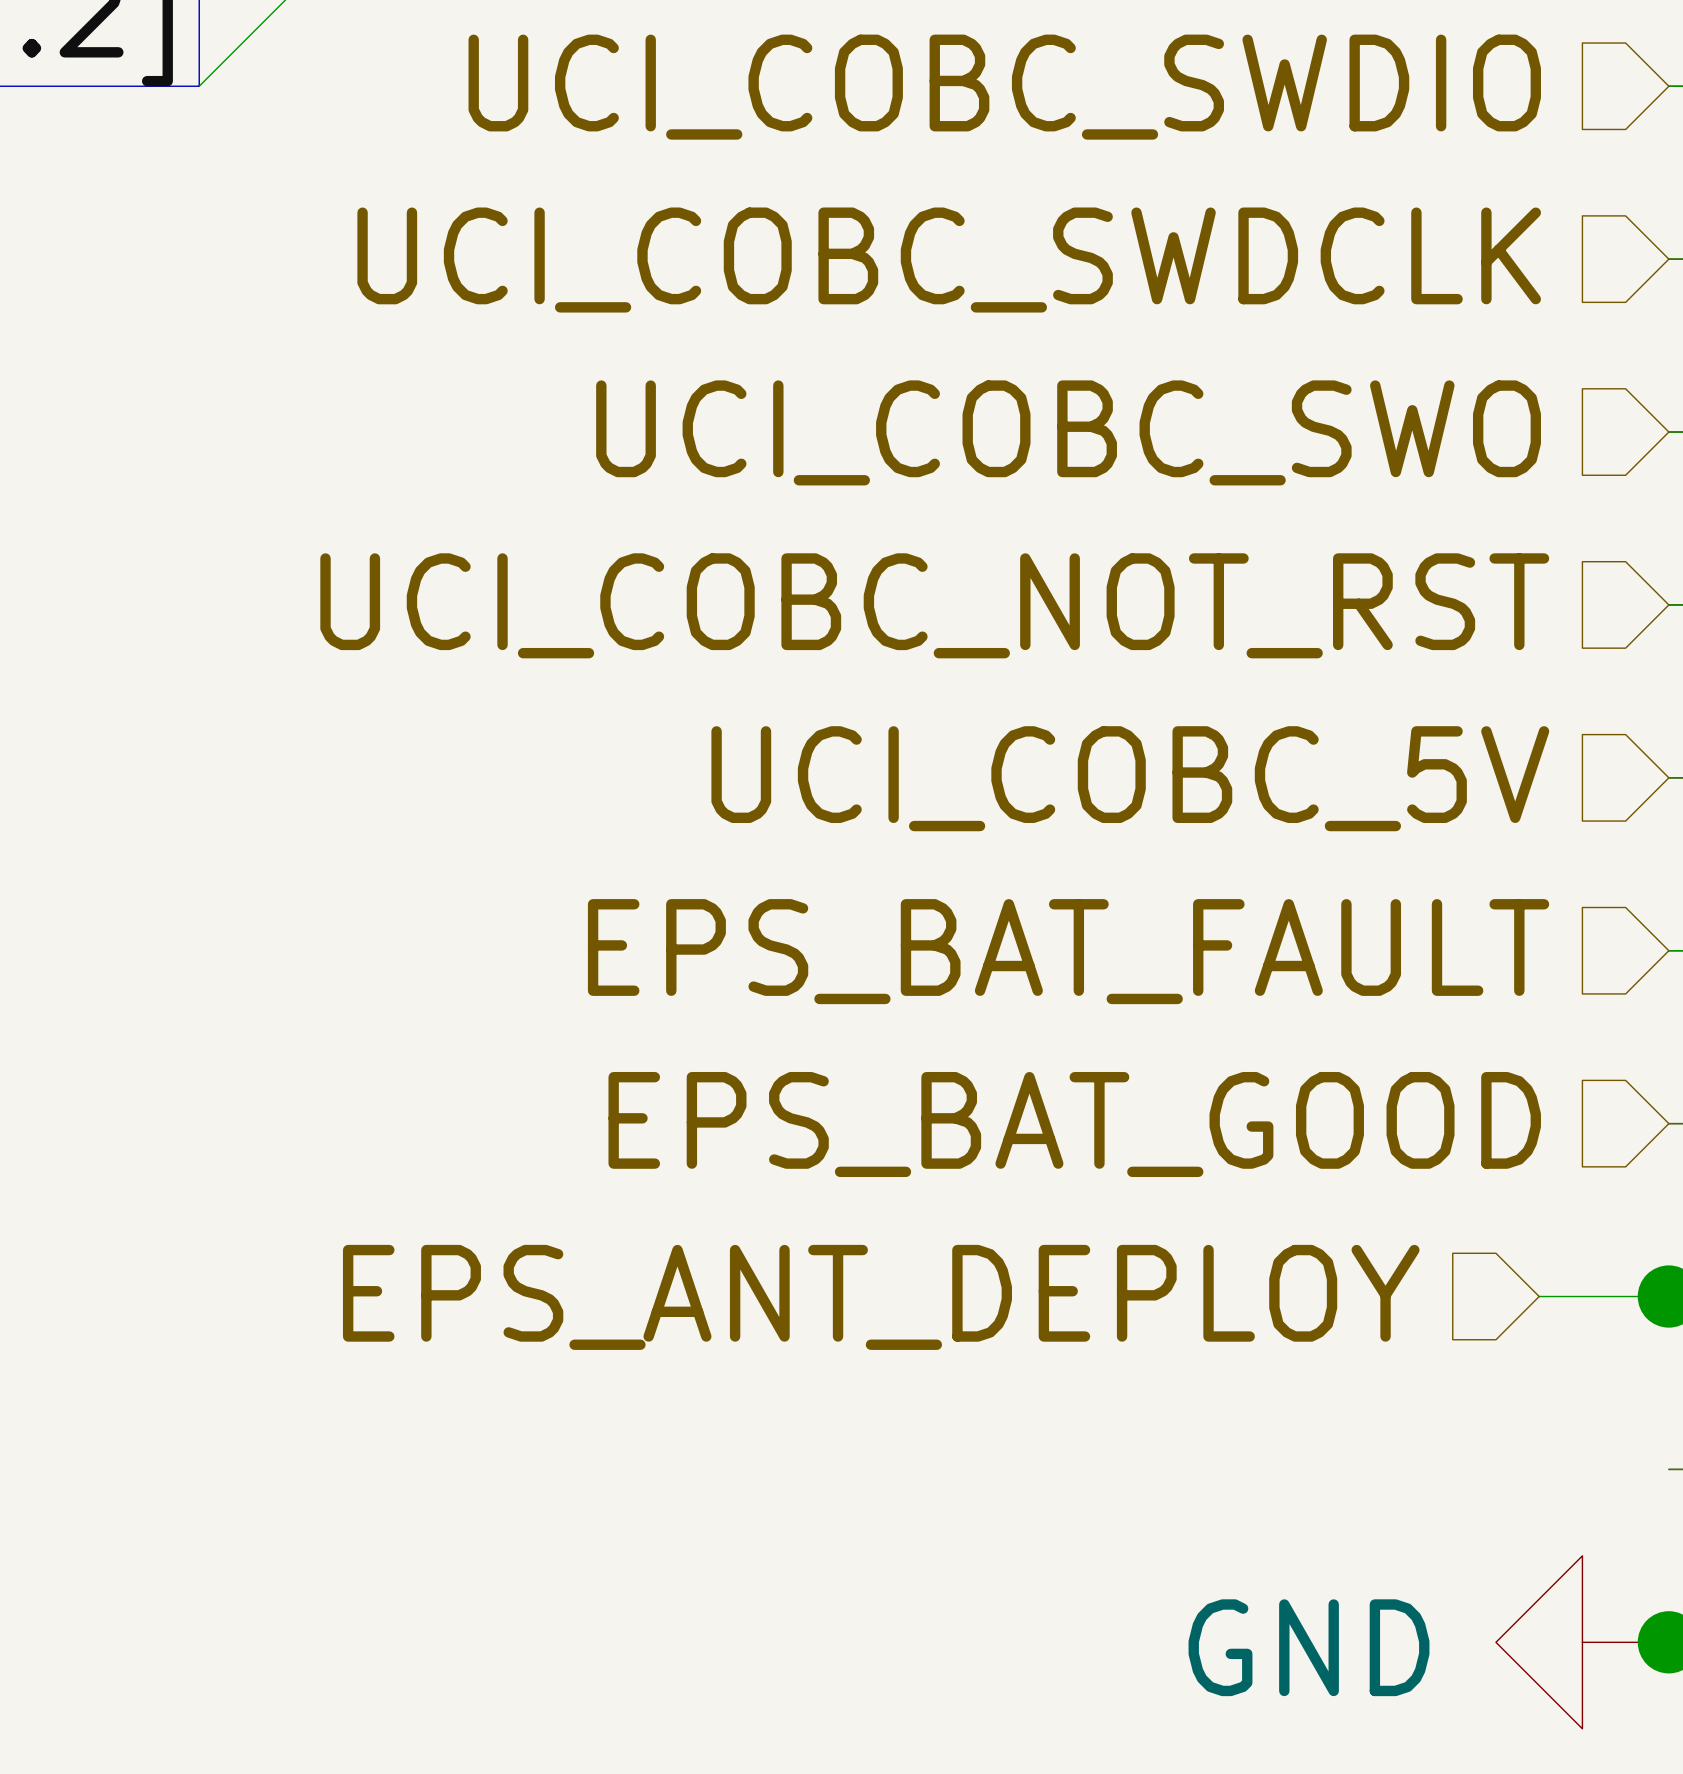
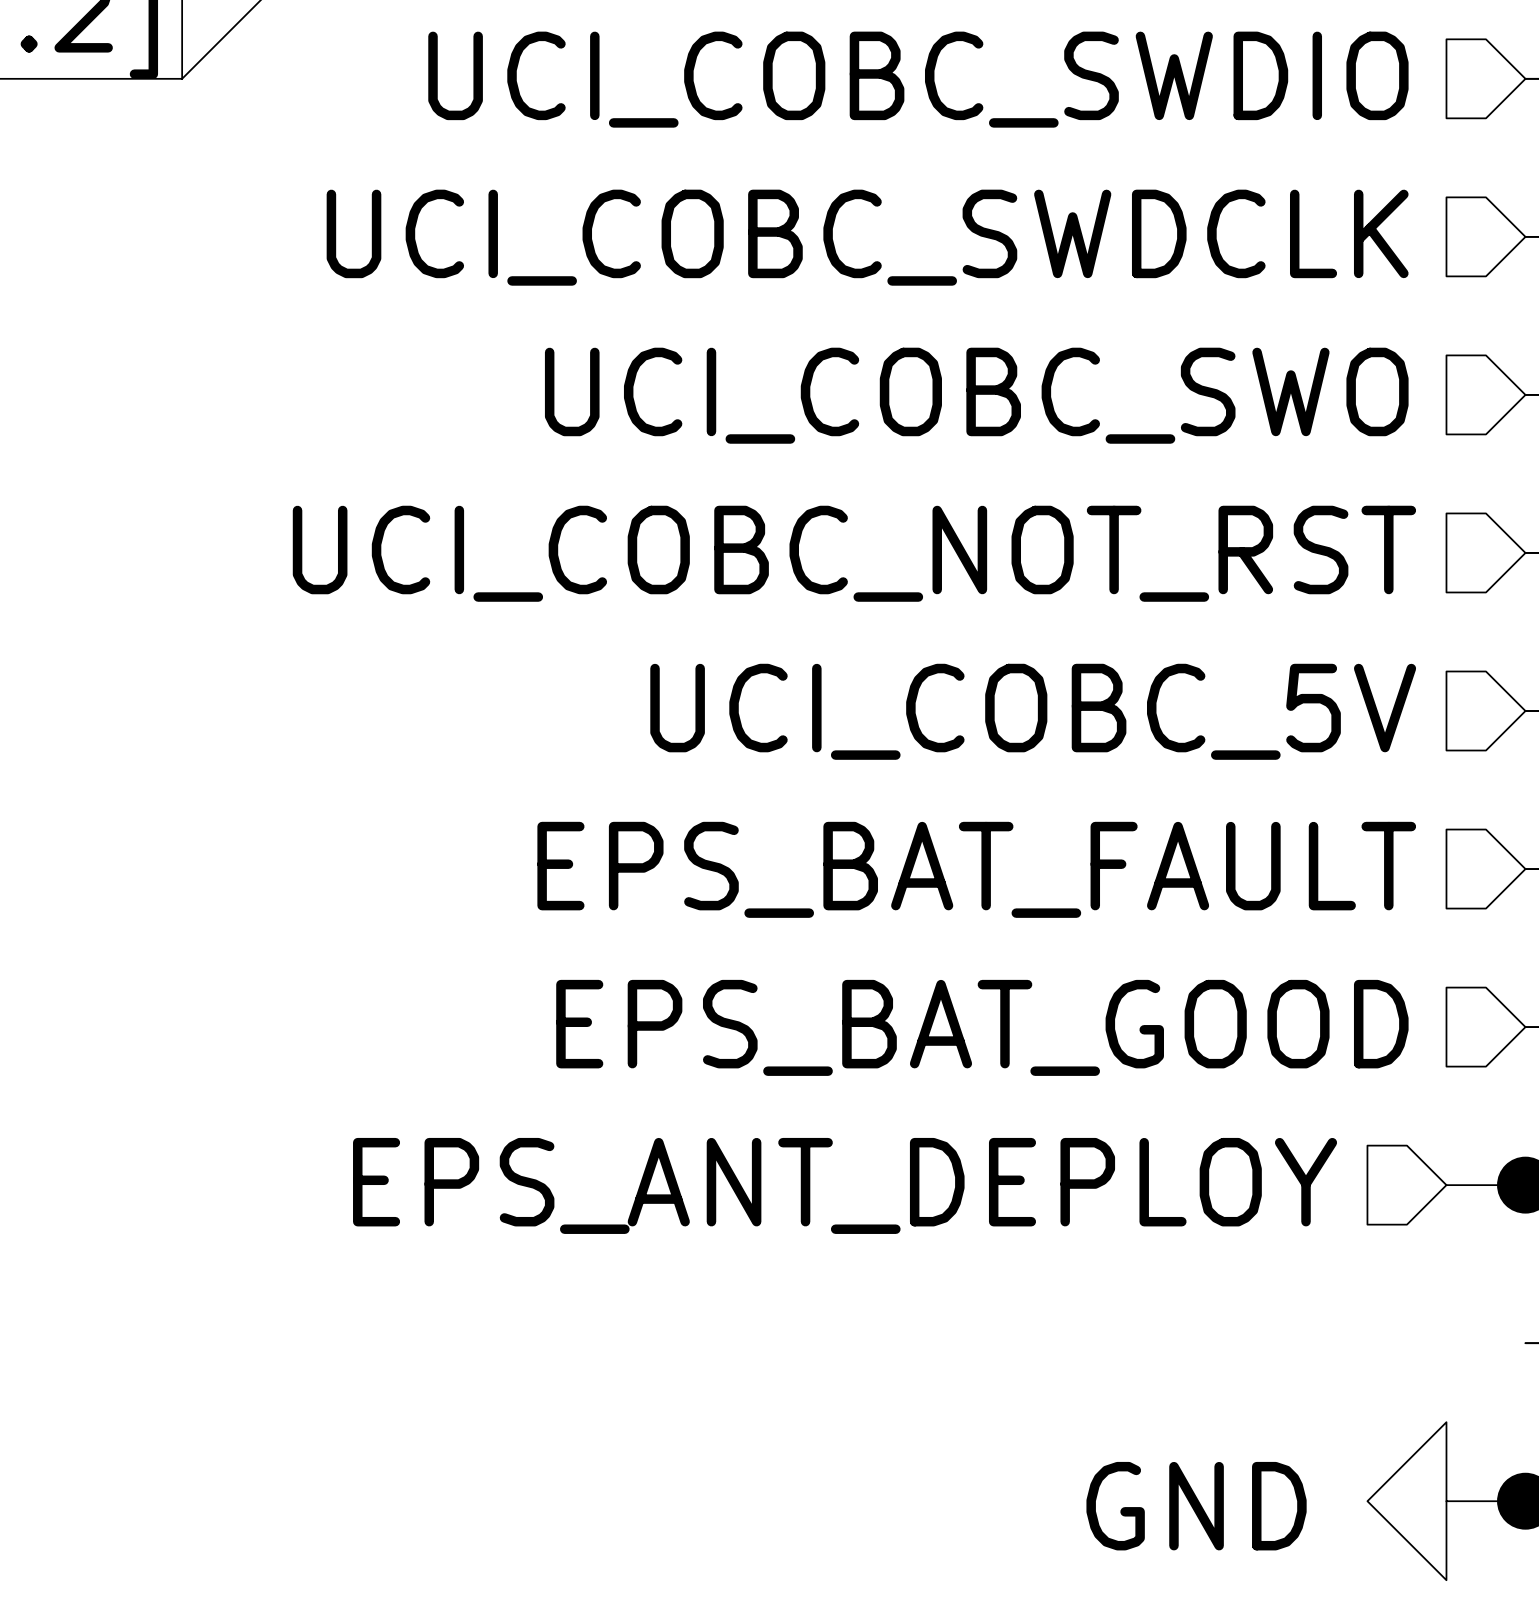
wire: (1539, 1296) (1582, 1296) -> none
hierarchical label position: EPS_ANT_DEPLOY (881, 1297) -> EPS_ANT_DEPLOY (845, 1185)

